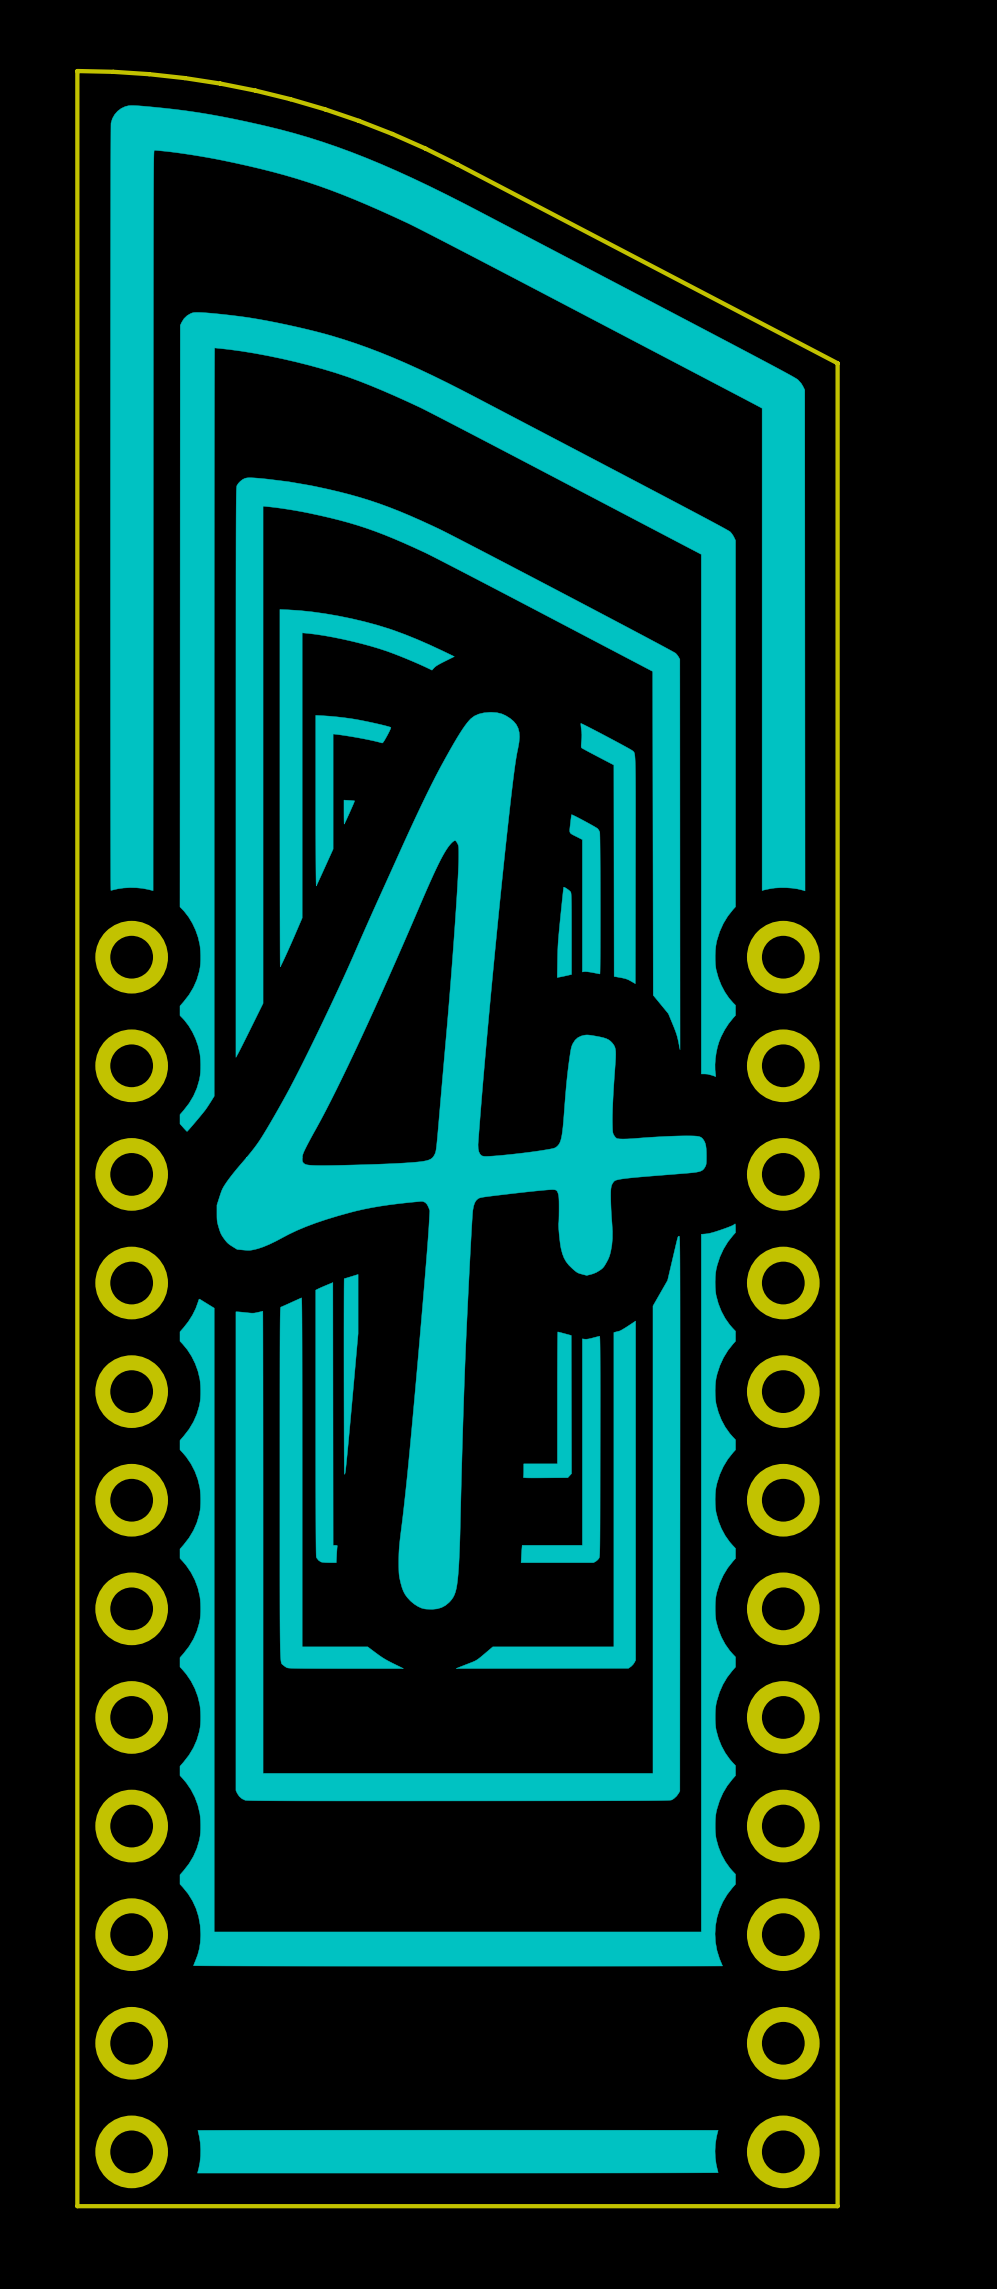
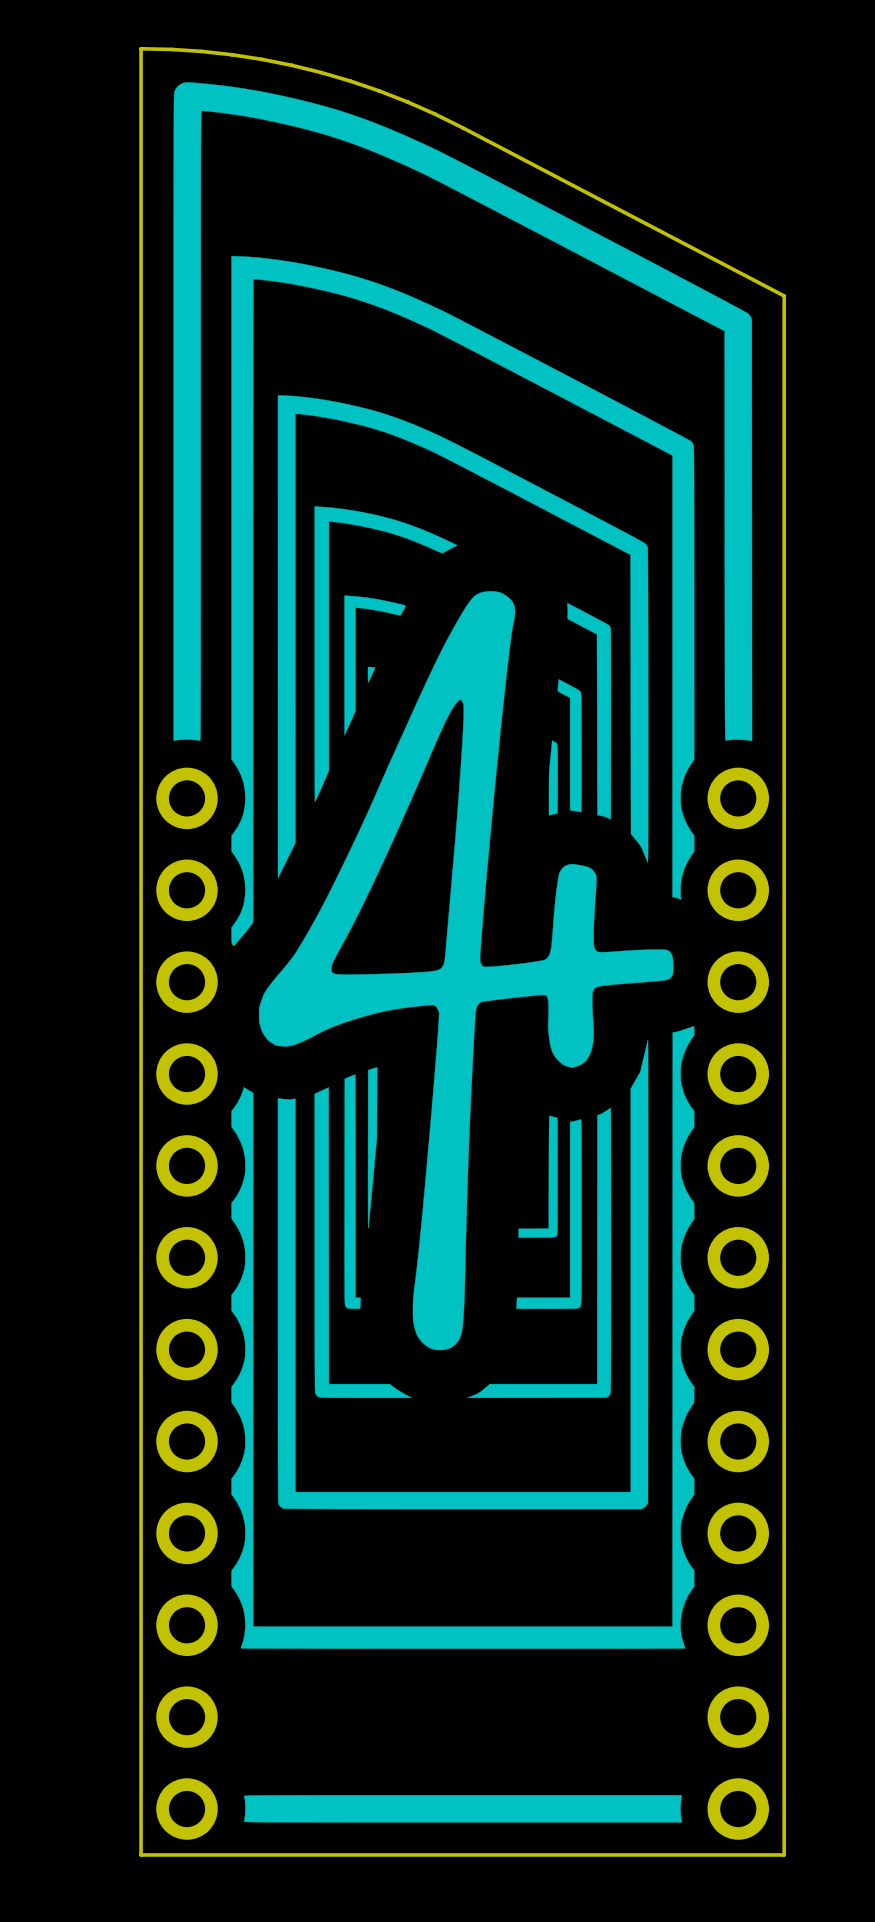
drawing shape: [110, 105, 806, 2174] -> [173, 82, 753, 1823]

